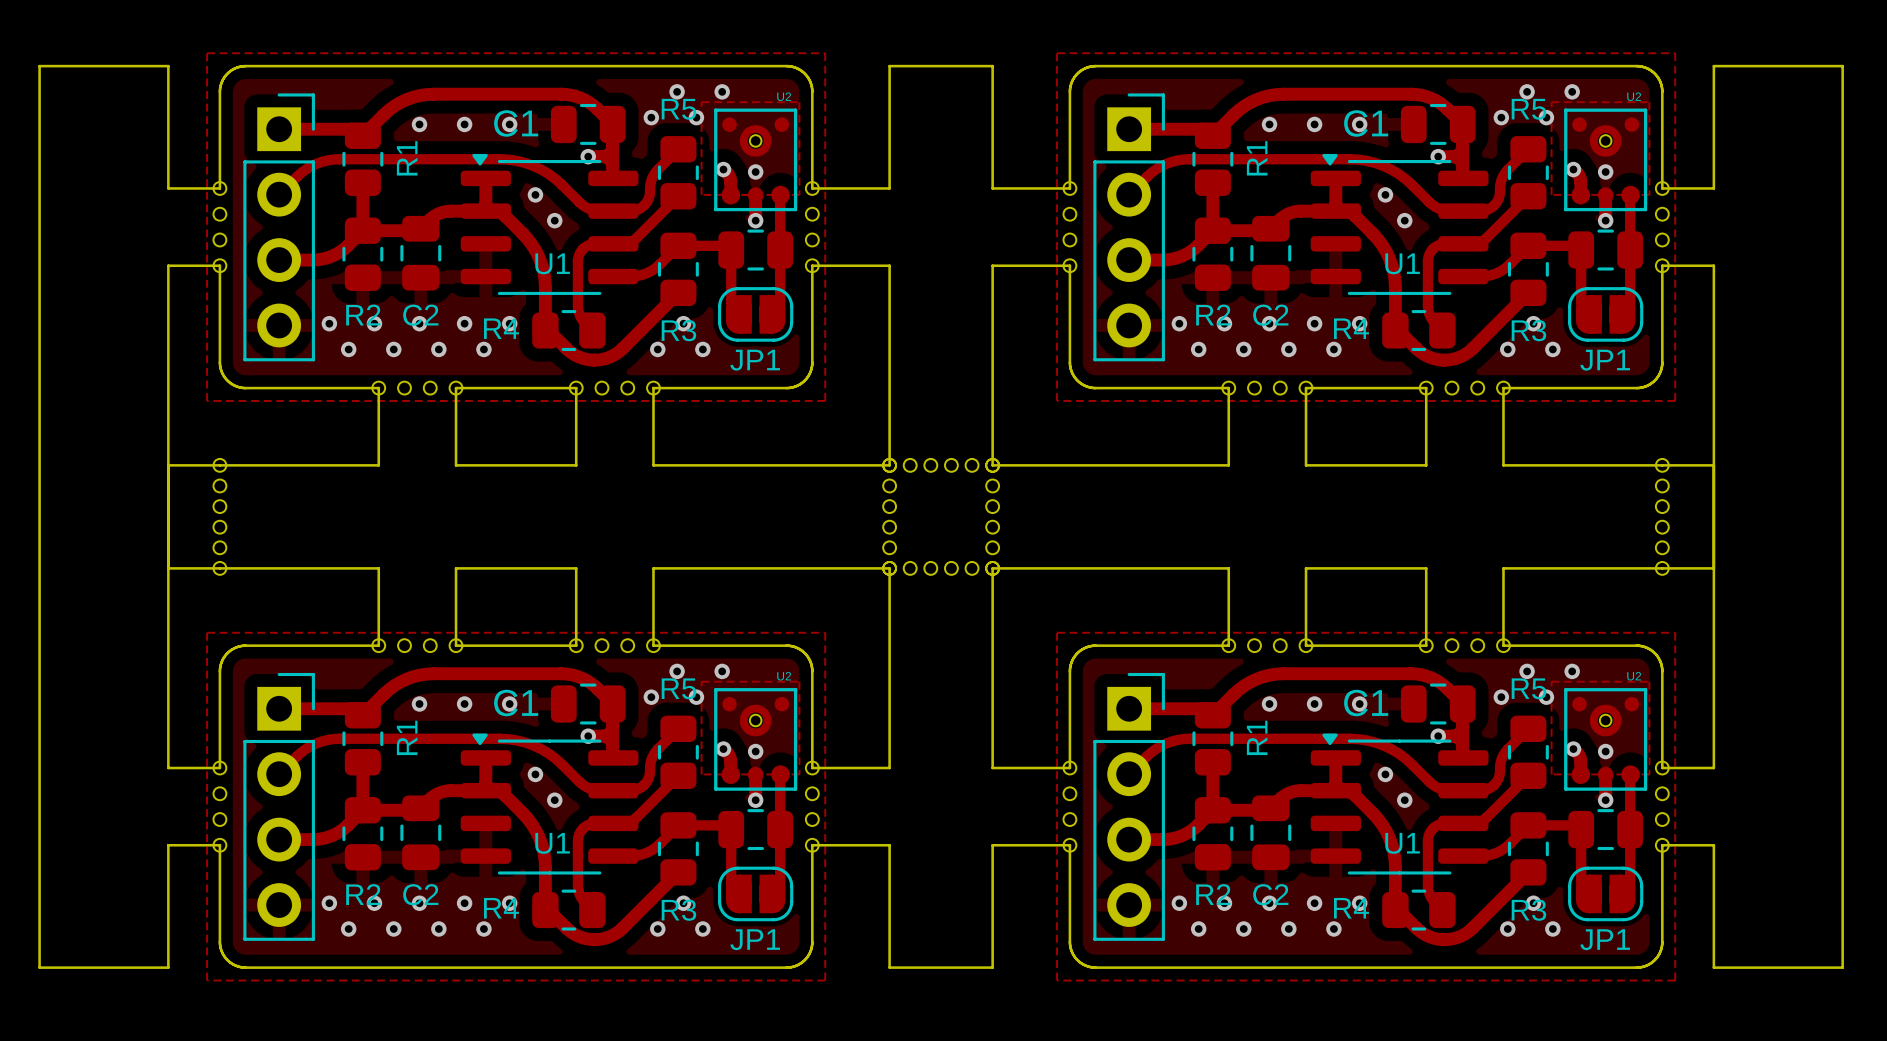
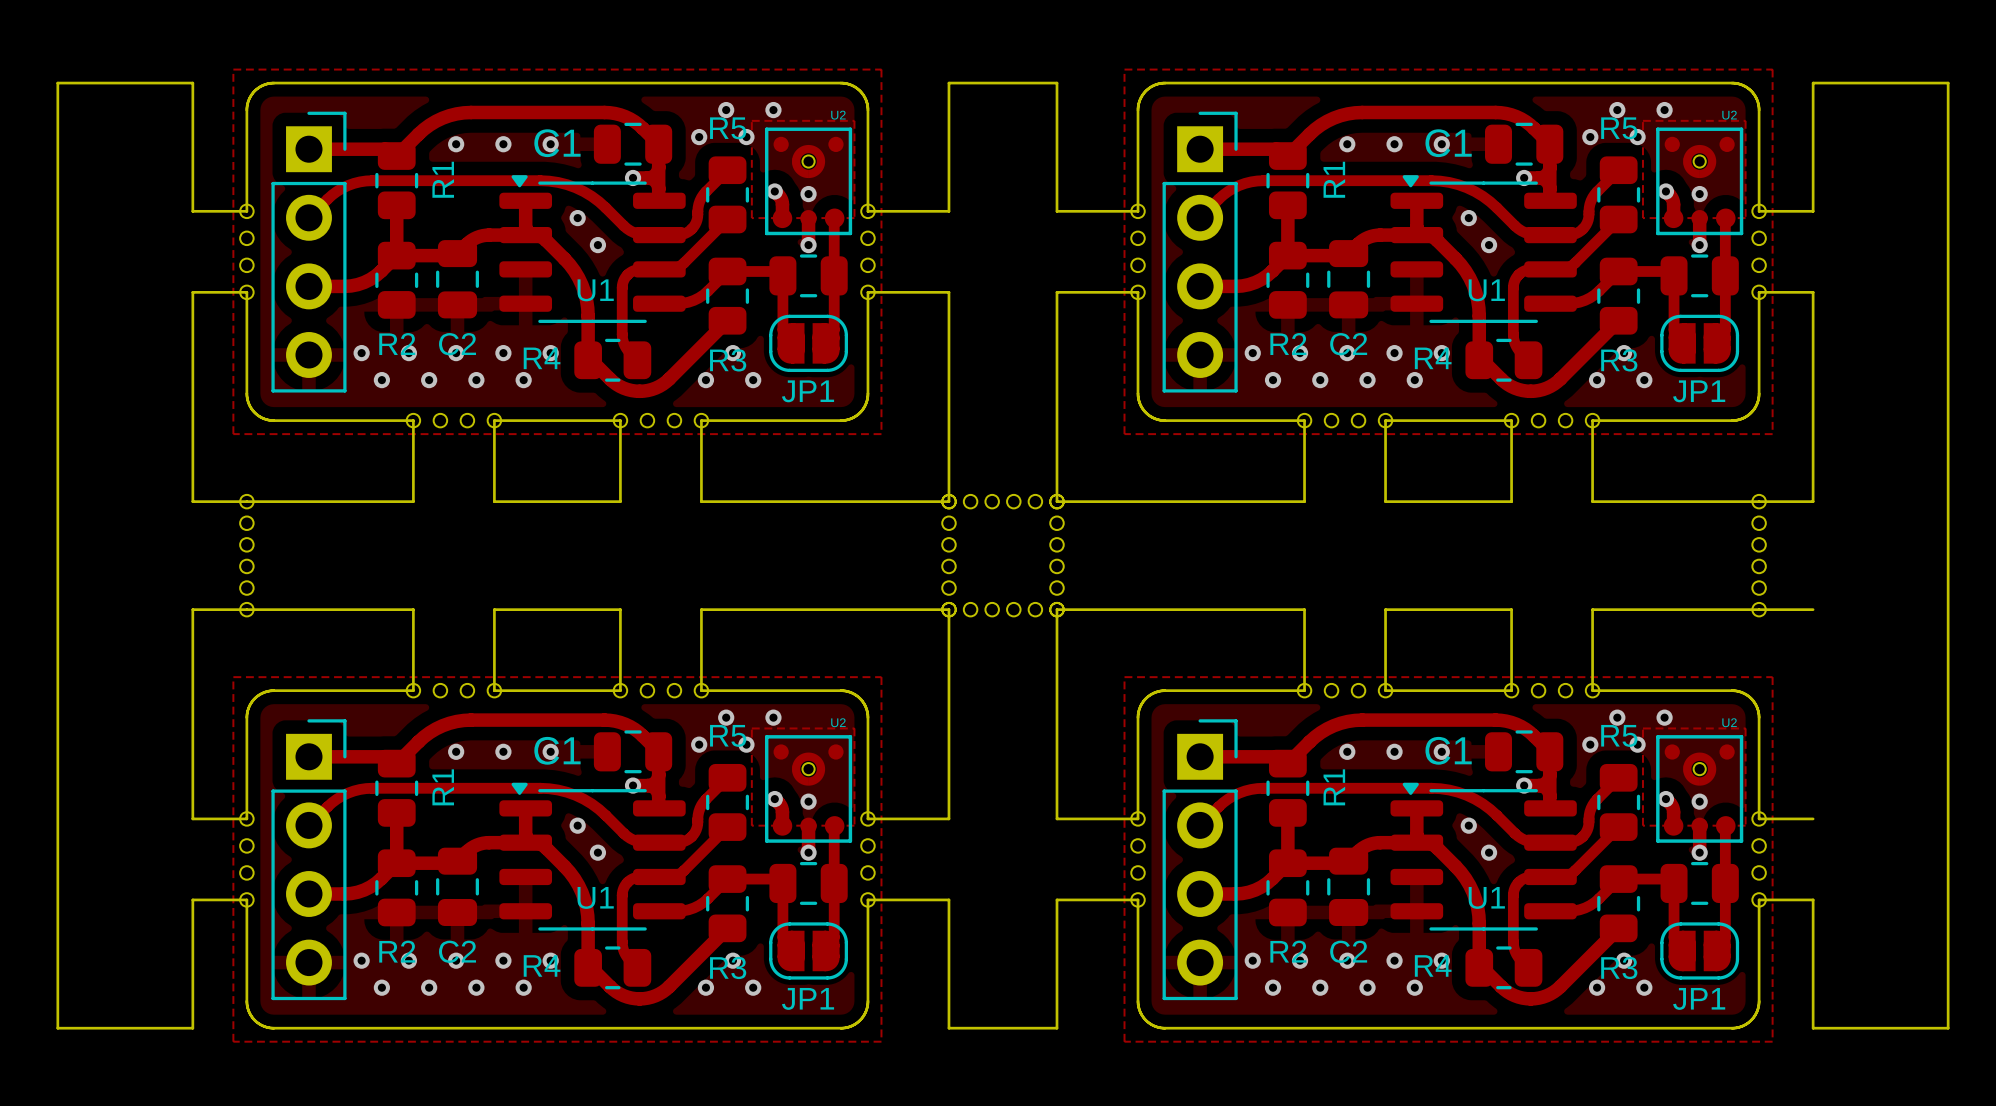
board edge: (1713, 265) (1713, 768) -> (1813, 292) (1813, 501)
board edge: (168, 465) (168, 768) -> (192, 609) (192, 818)

